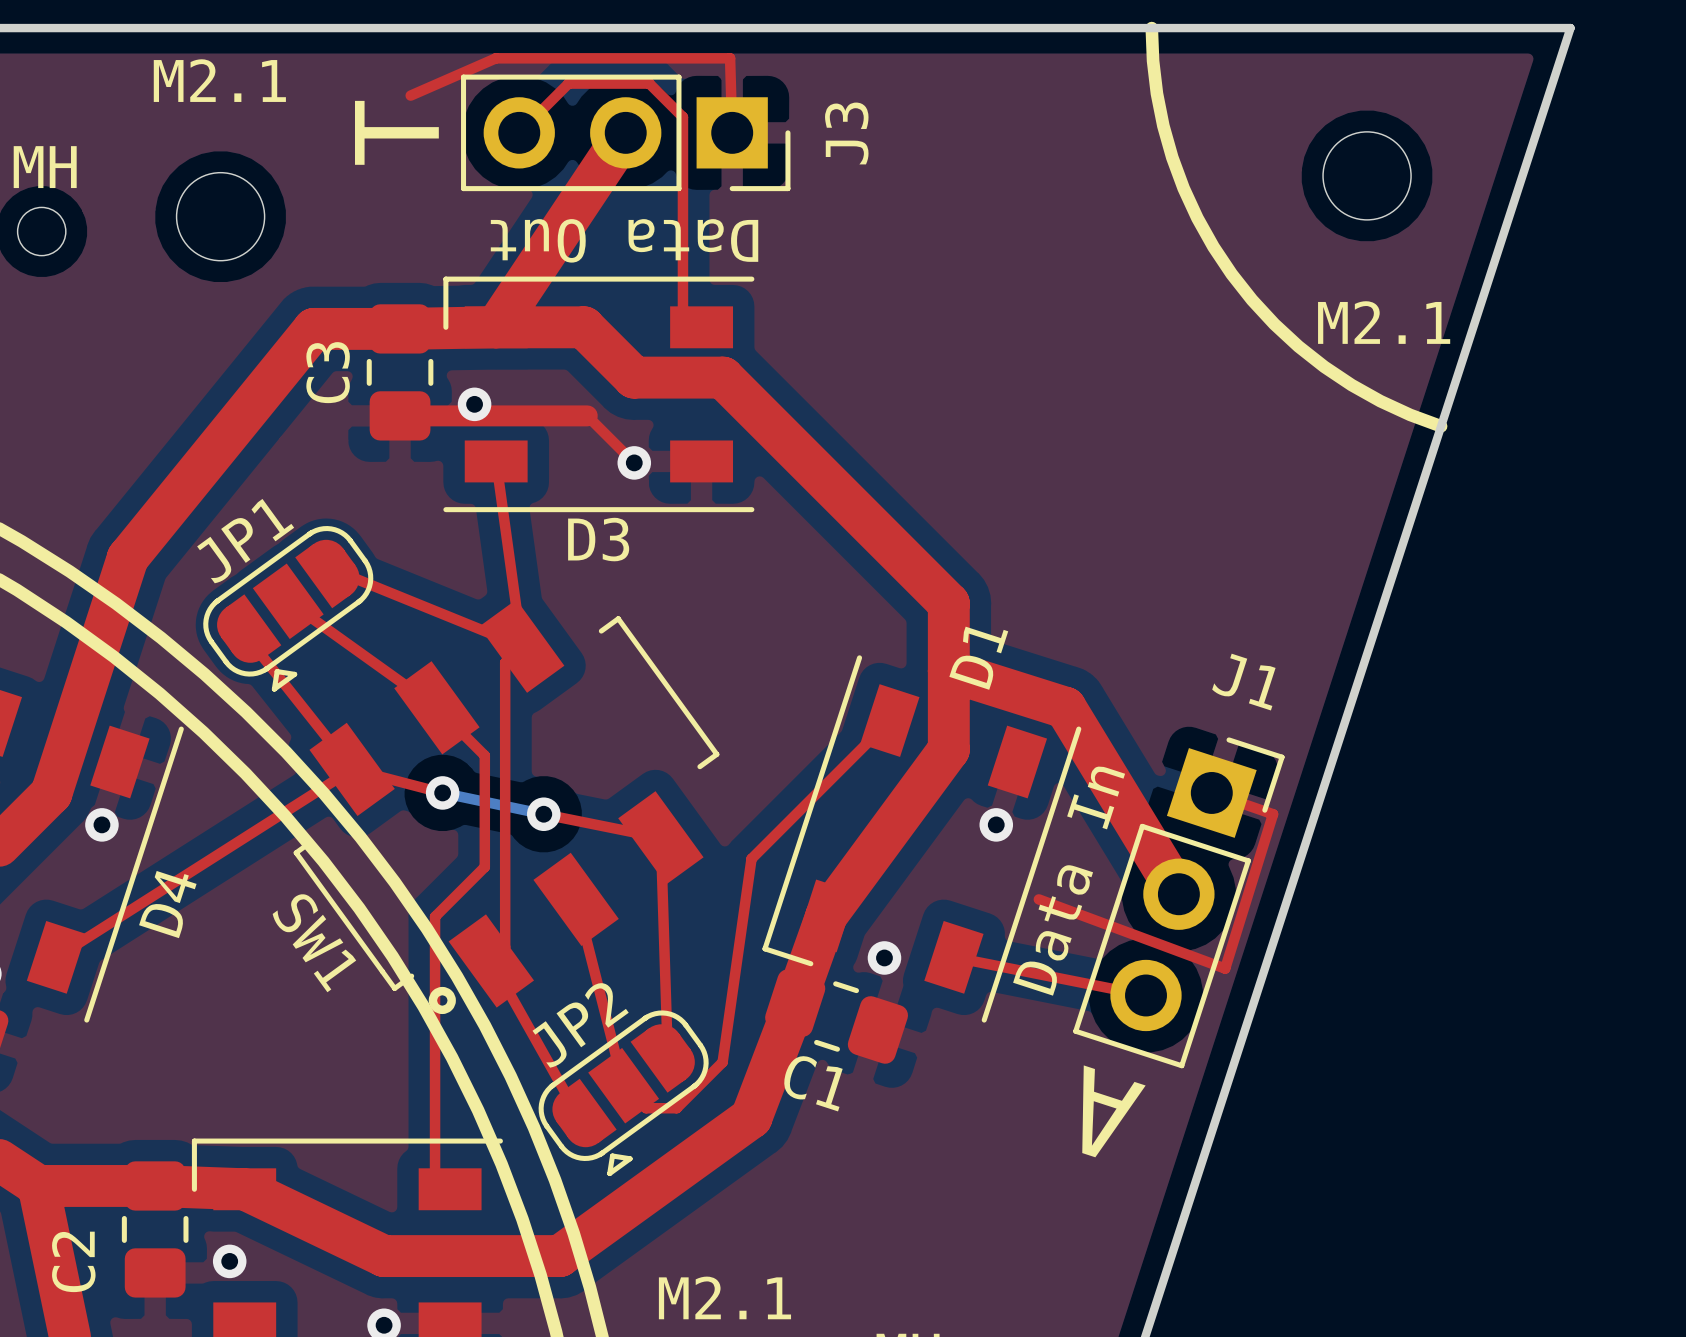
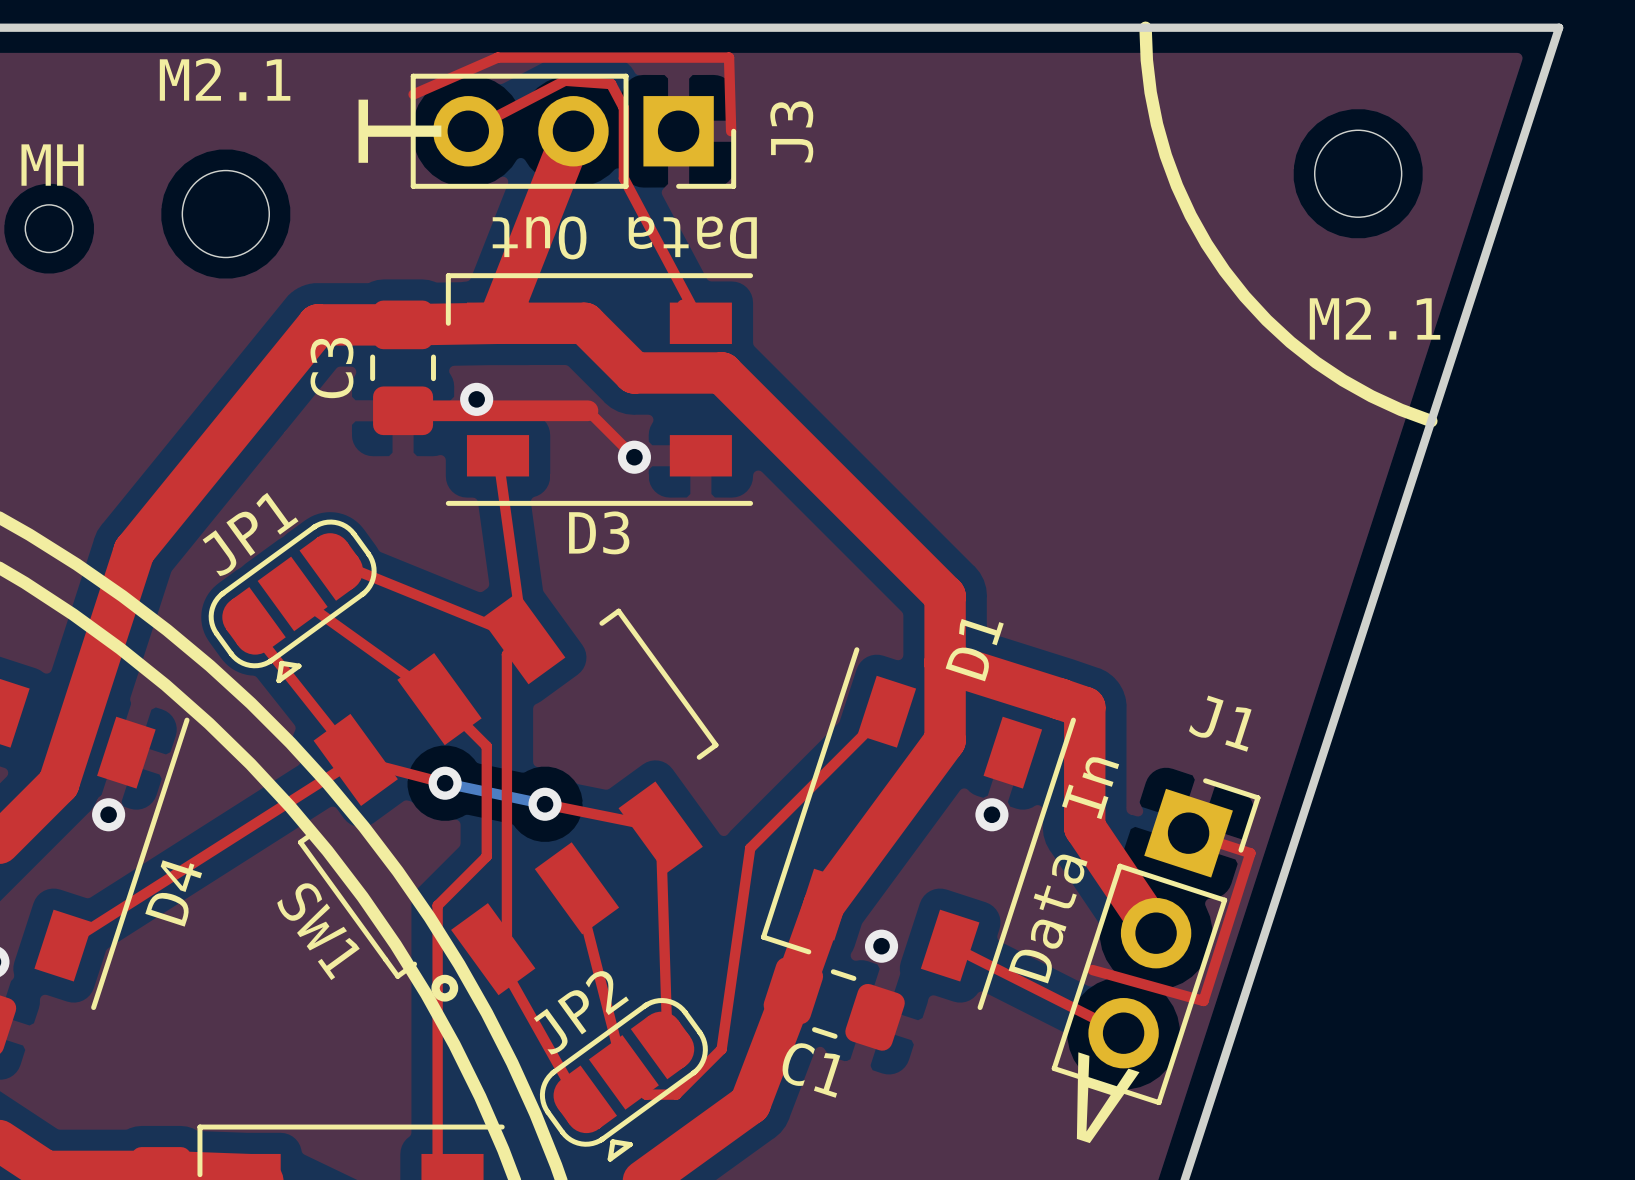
top track: none -> (468, 131) (565, 80) (611, 84) (623, 108) (623, 178) (700, 323)
top track: (519, 132) (568, 83) (649, 83) (682, 117) (682, 308) -> none
top track: (625, 132) (496, 327) -> (573, 131) (498, 323)
J3 position: (625, 132) -> (573, 131)
top track: (1065, 707) (1178, 894) -> (1060, 699) (1084, 707) (1084, 827) (1156, 933)
top track: (1211, 792) (1273, 814) (1225, 968) (1038, 899) -> none
top track: none -> (1188, 833) (1250, 853) (1203, 1000) (1092, 970)
J1 position: (1178, 902) -> (1156, 941)
top track: (953, 957) (1146, 995) -> (950, 945) (1123, 1033)

